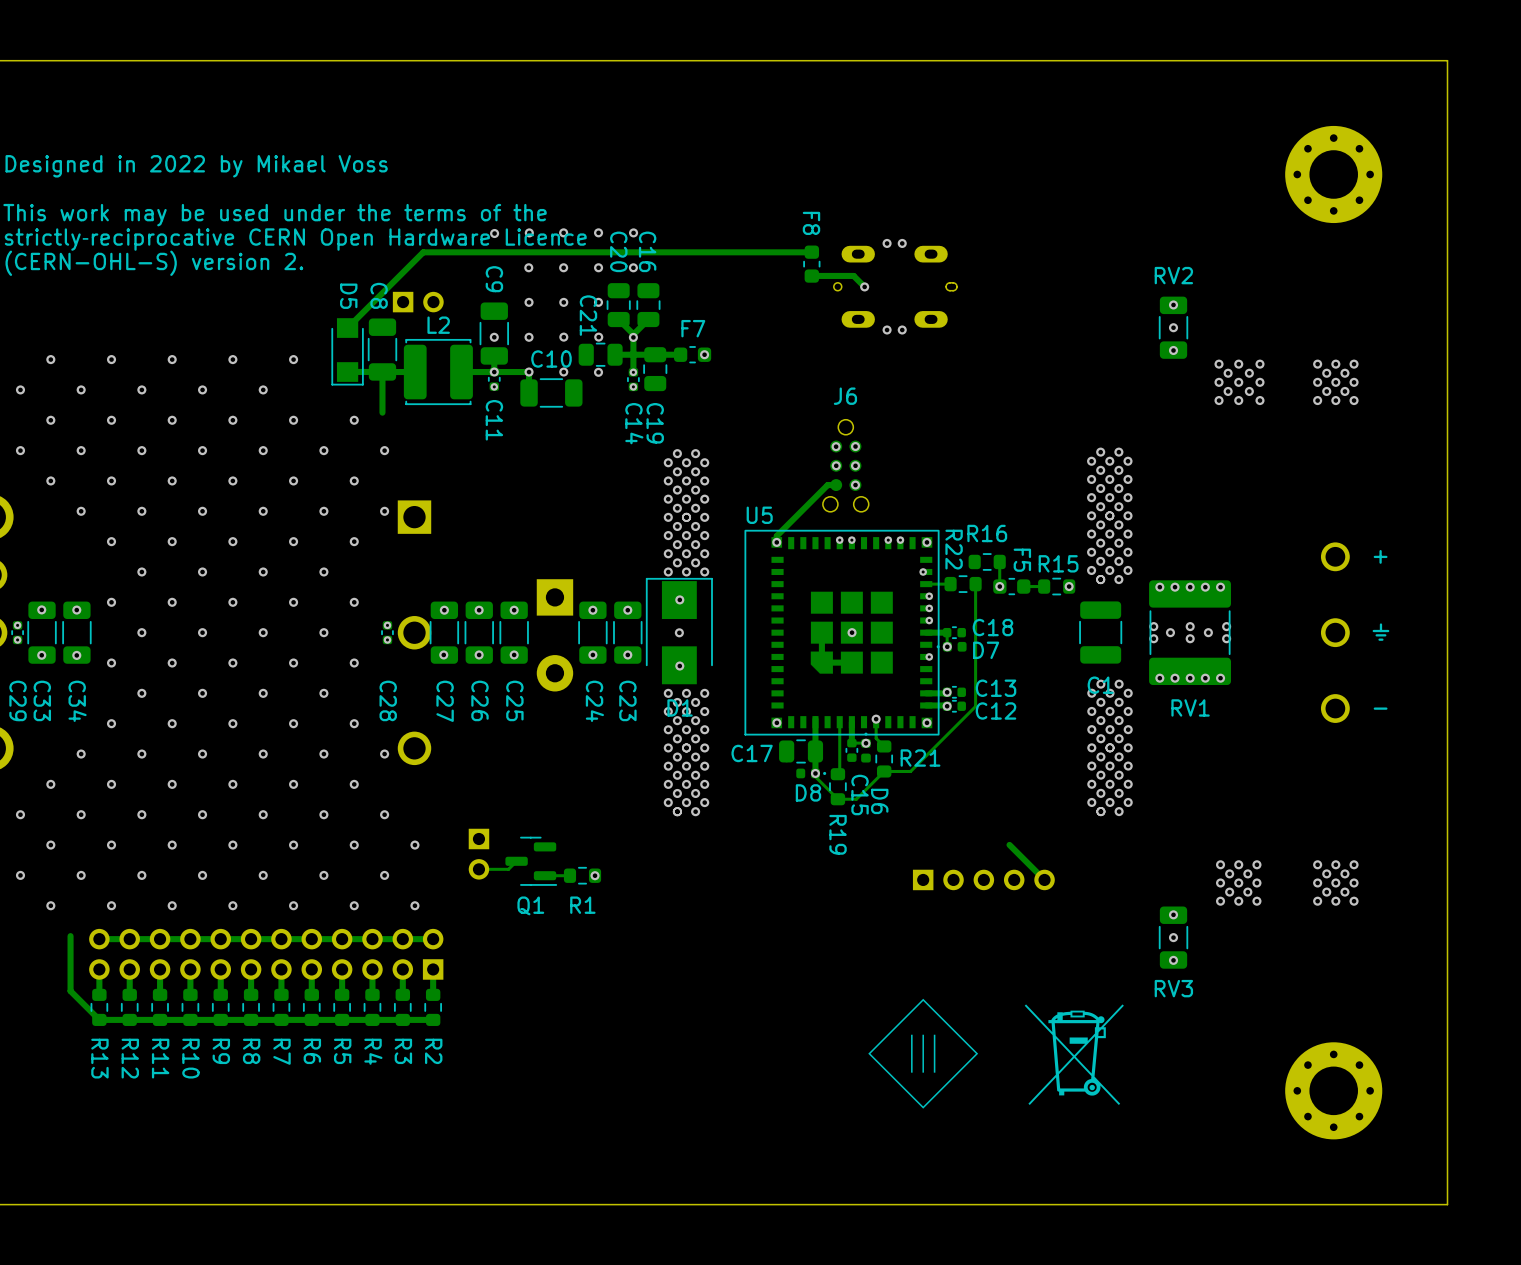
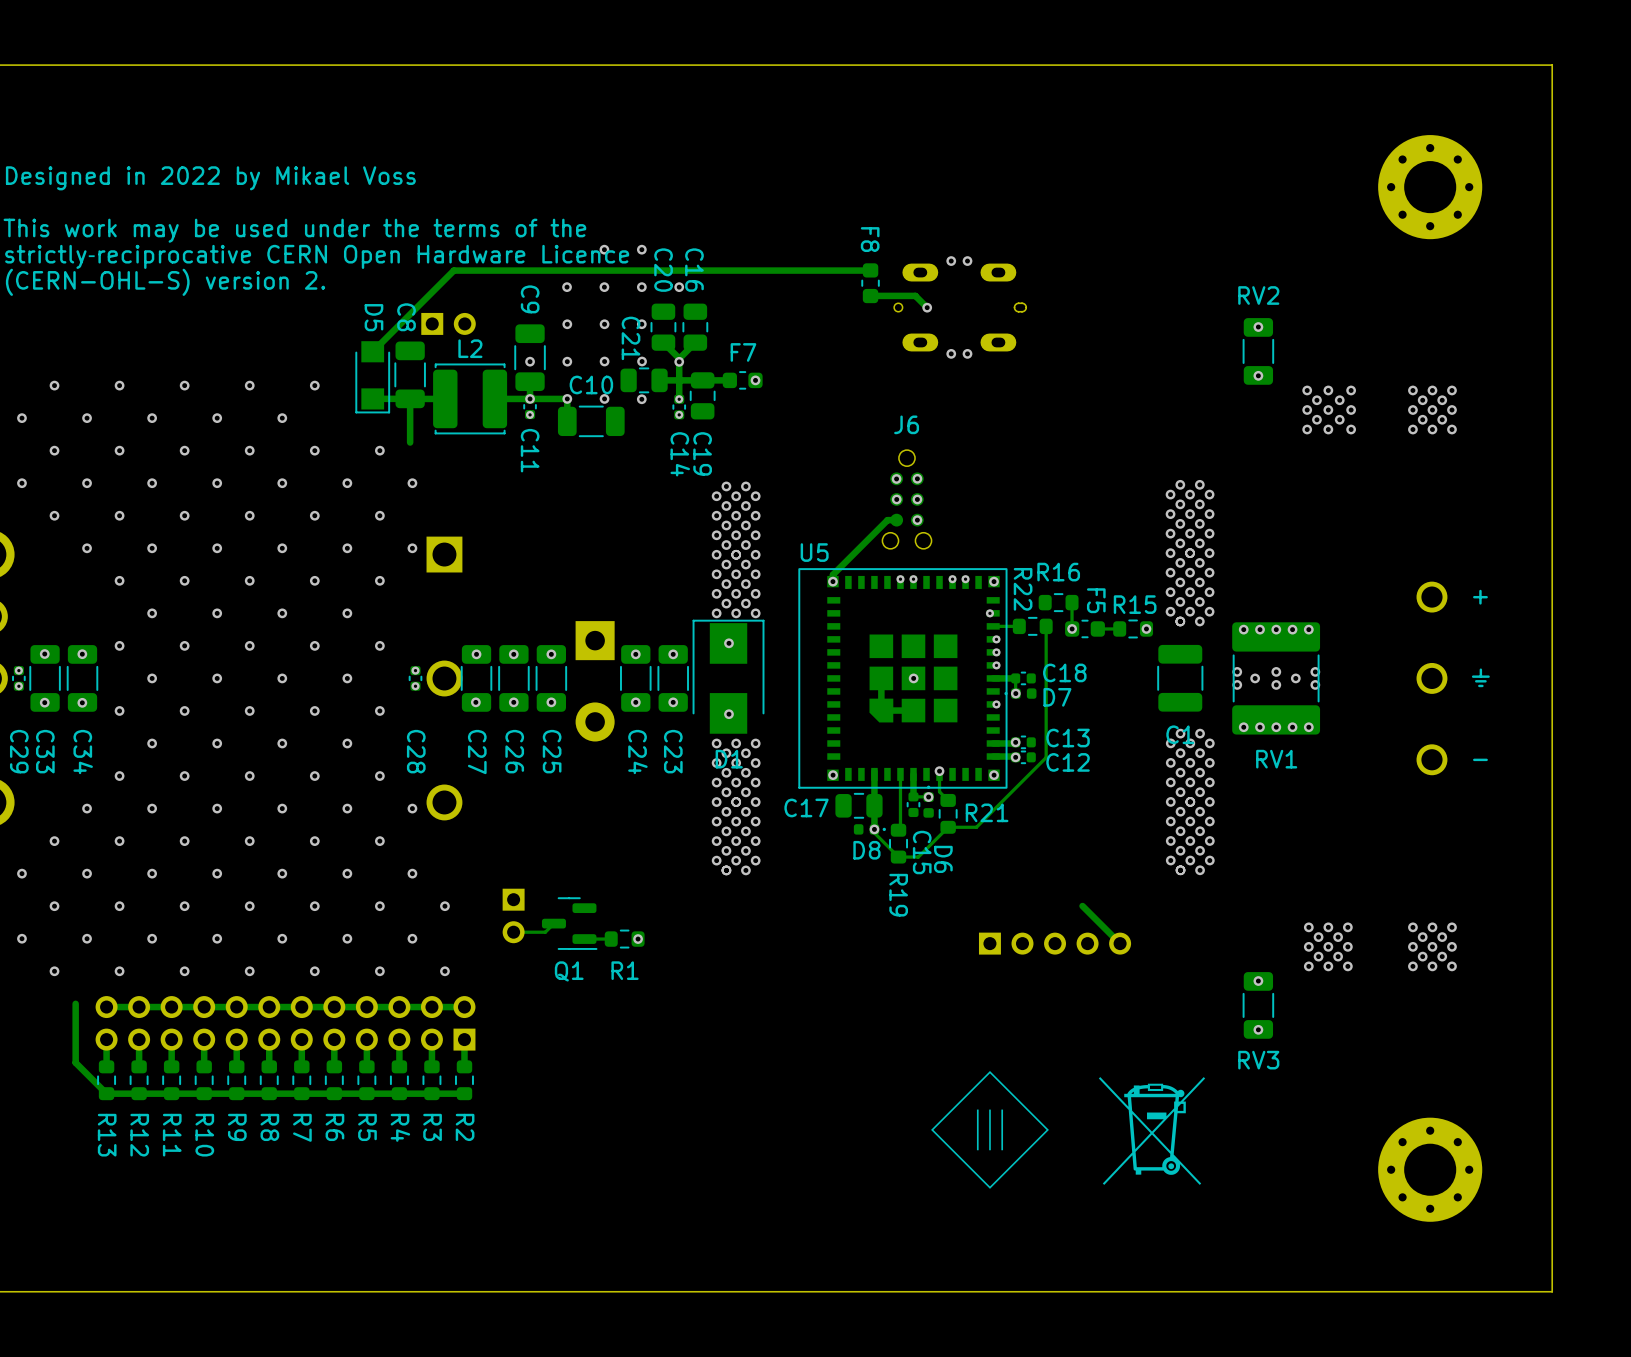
via: (529, 232) -> none
via: (633, 232) -> none
via: (494, 233) -> none
via: (1173, 327) -> none
via: (679, 632) -> none
via: (1173, 937) -> none

